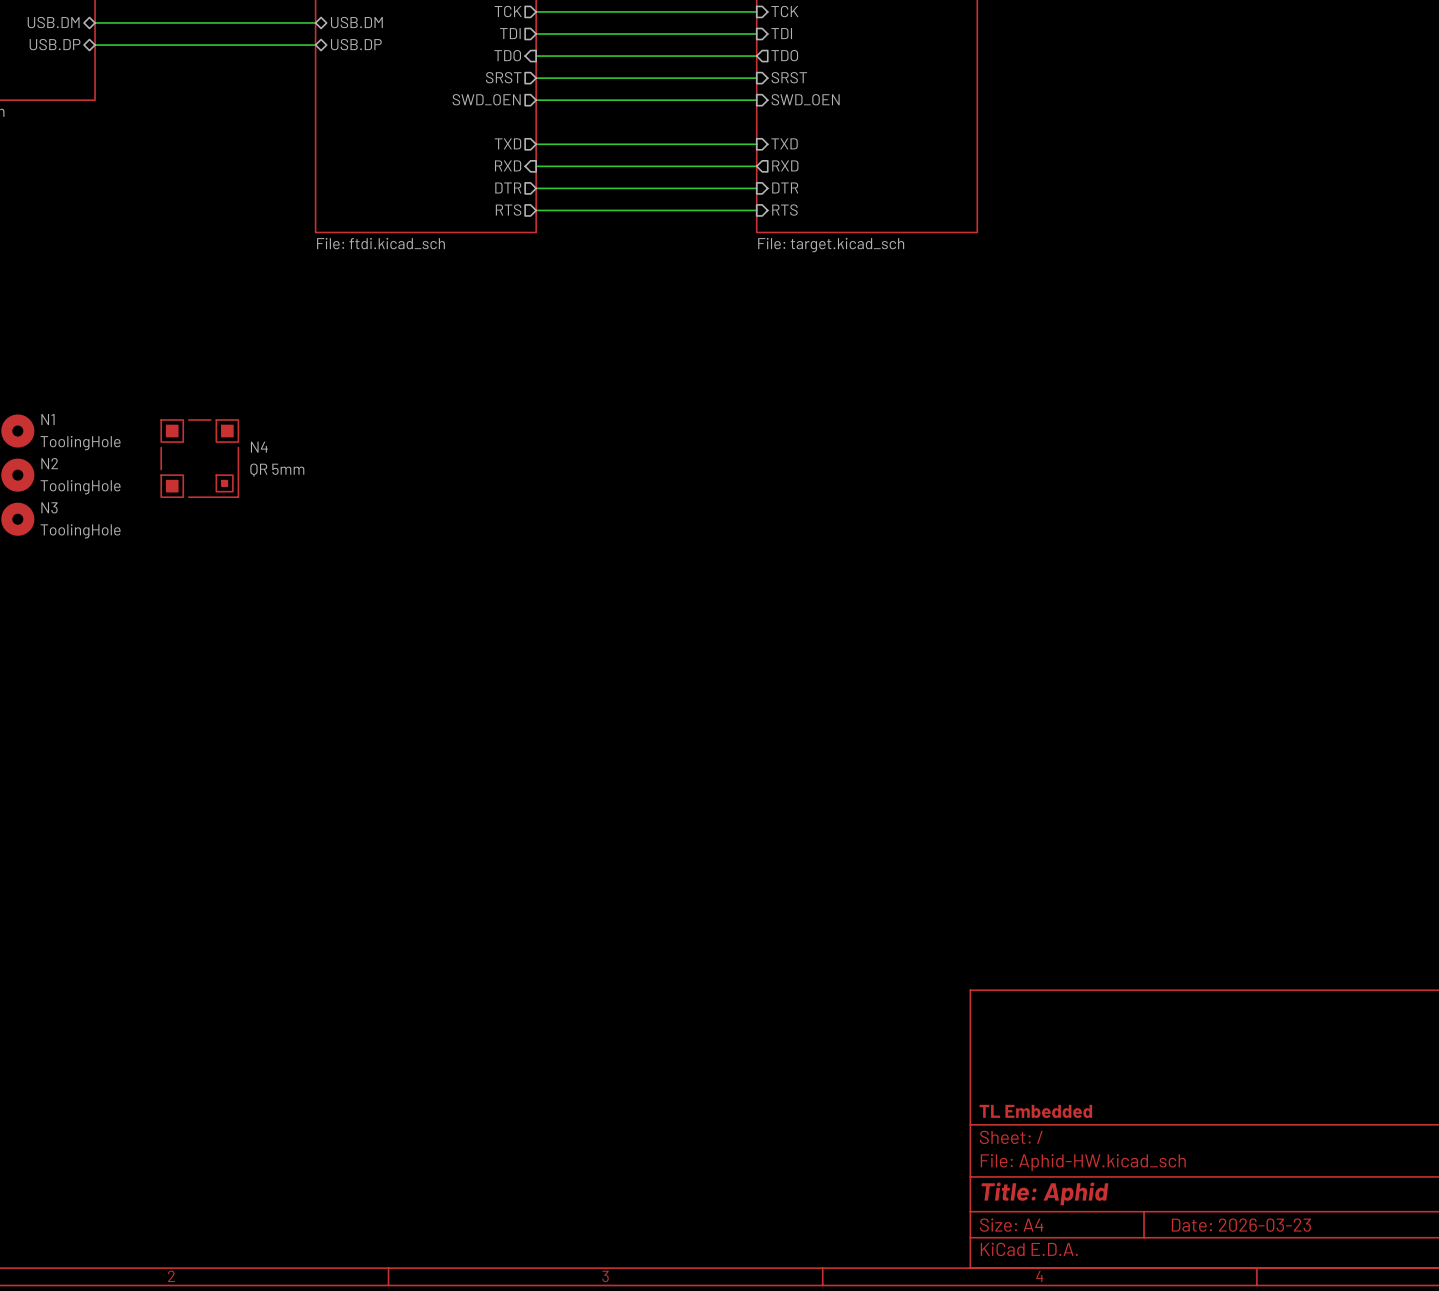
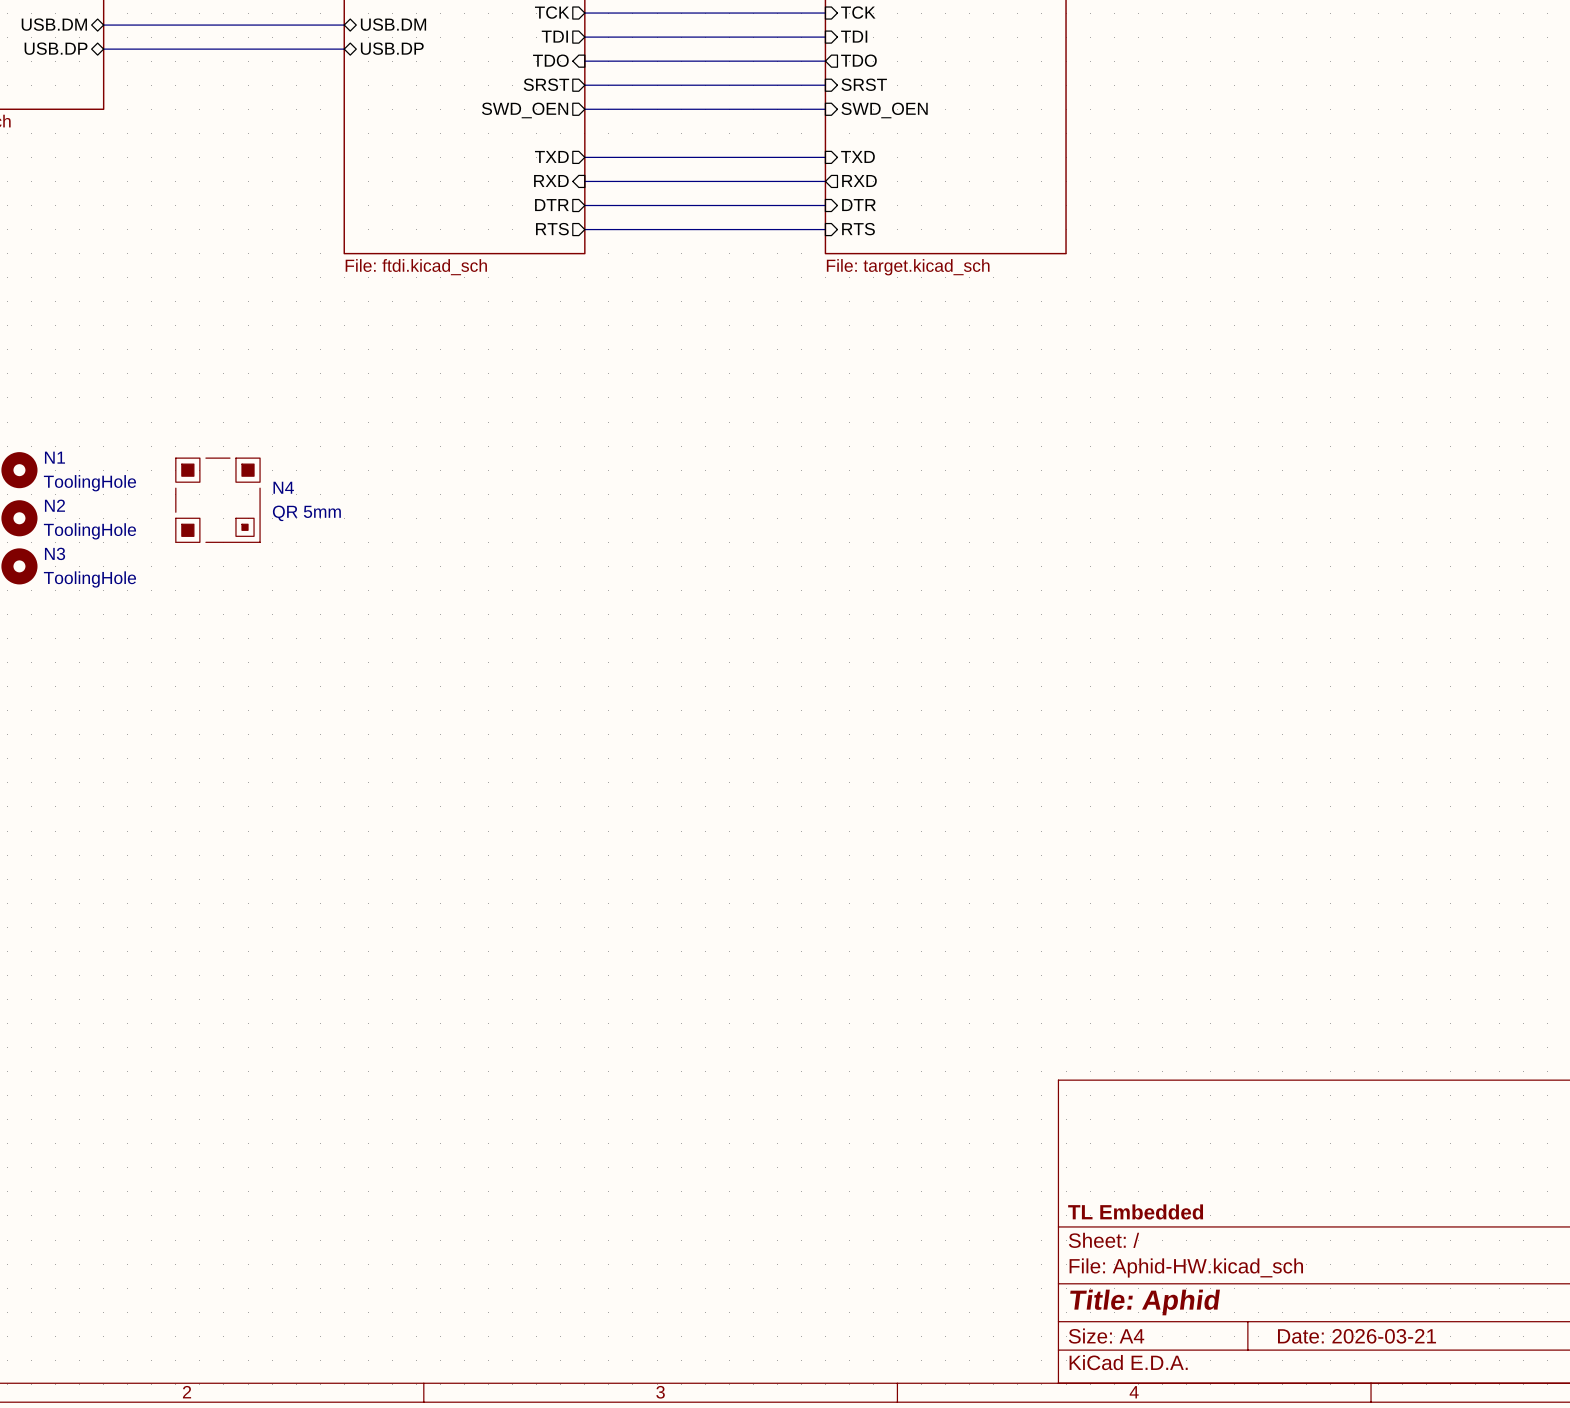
title block: Date: 2026-03-23 (1241, 1225) -> Date: 2026-03-21 (1357, 1336)

